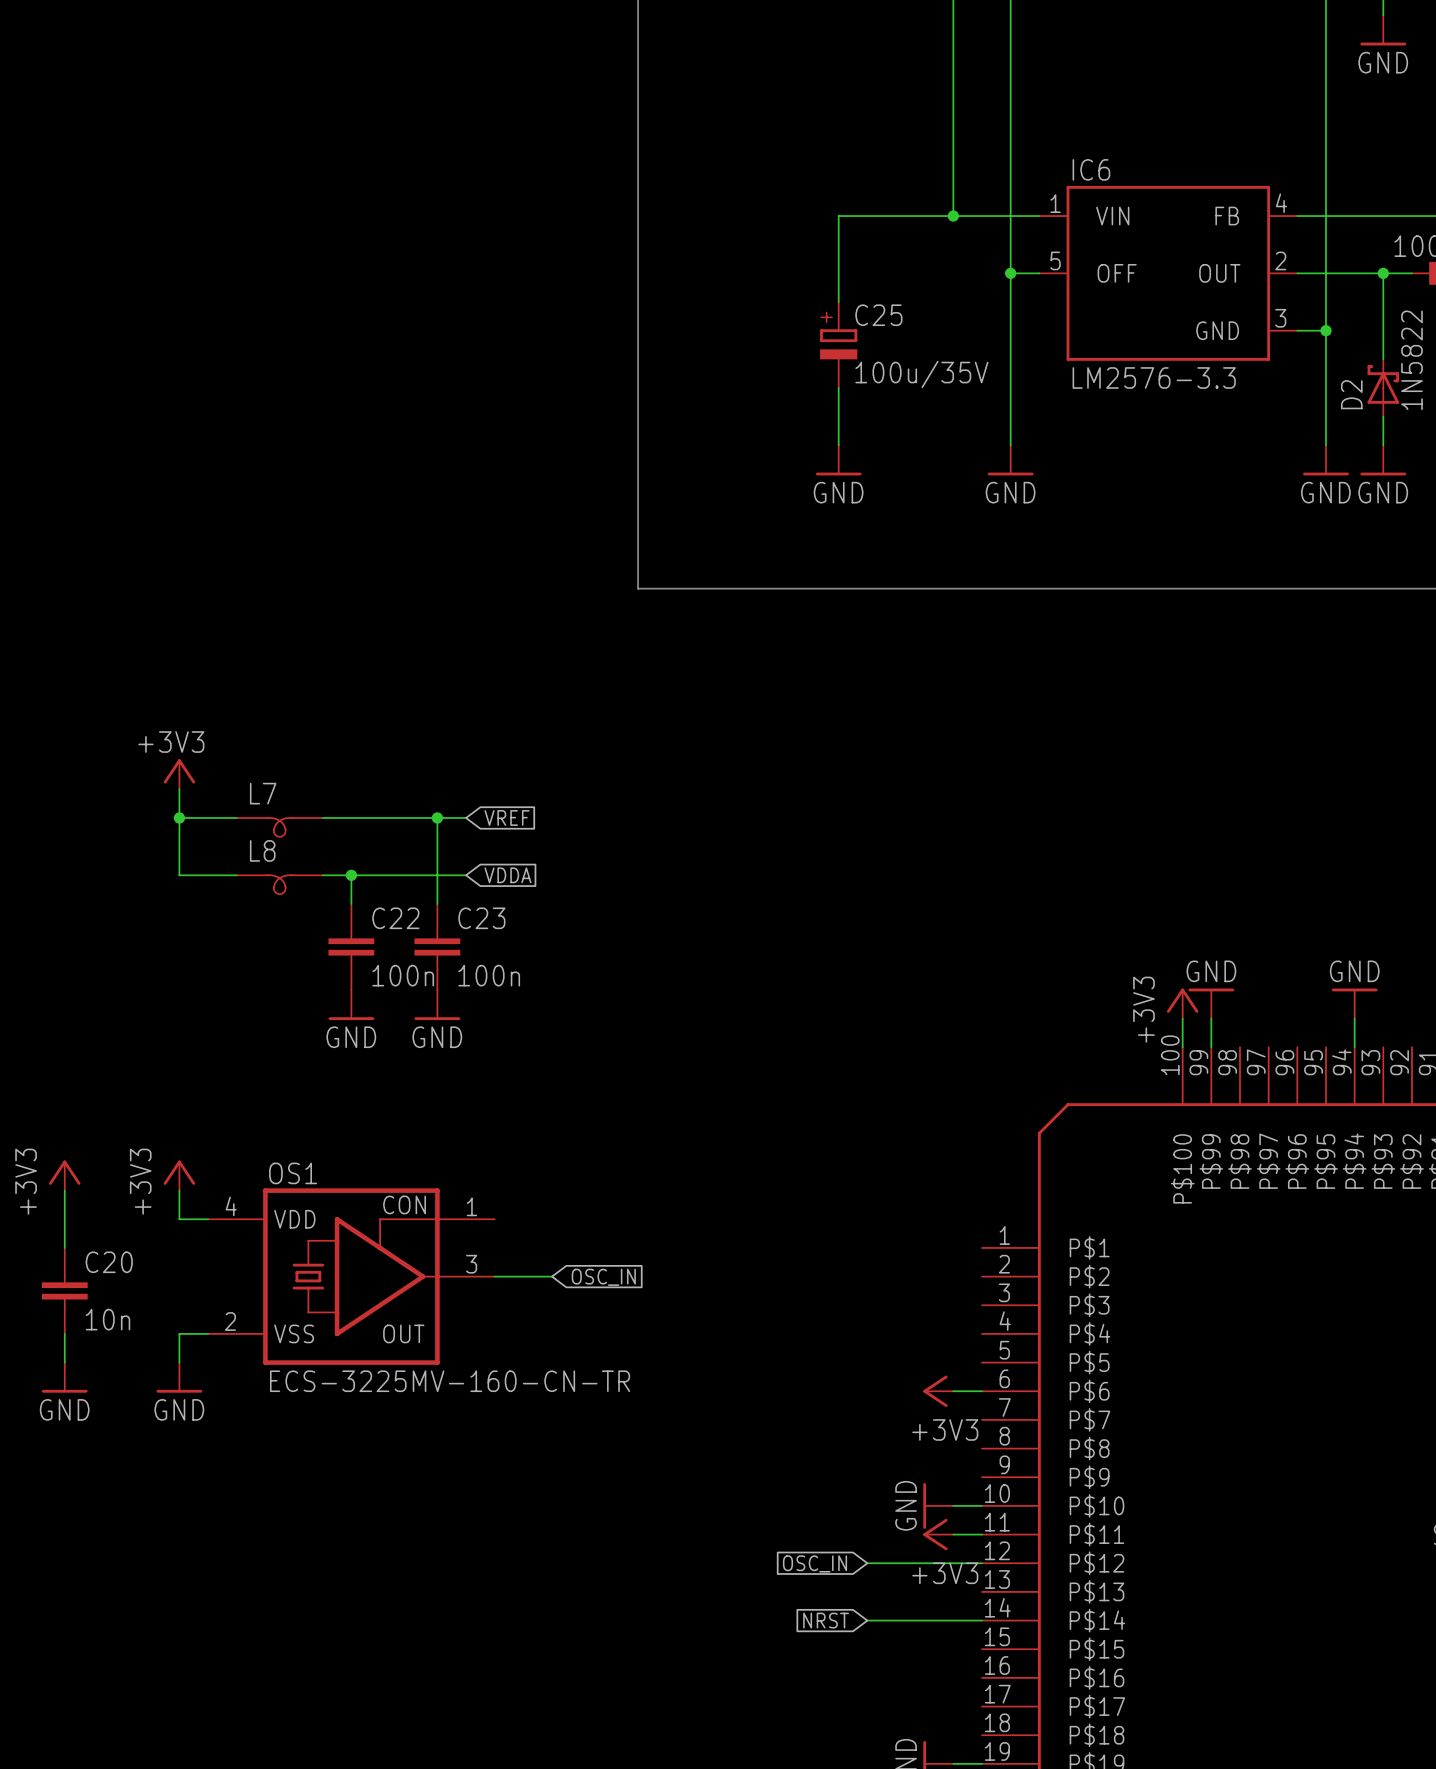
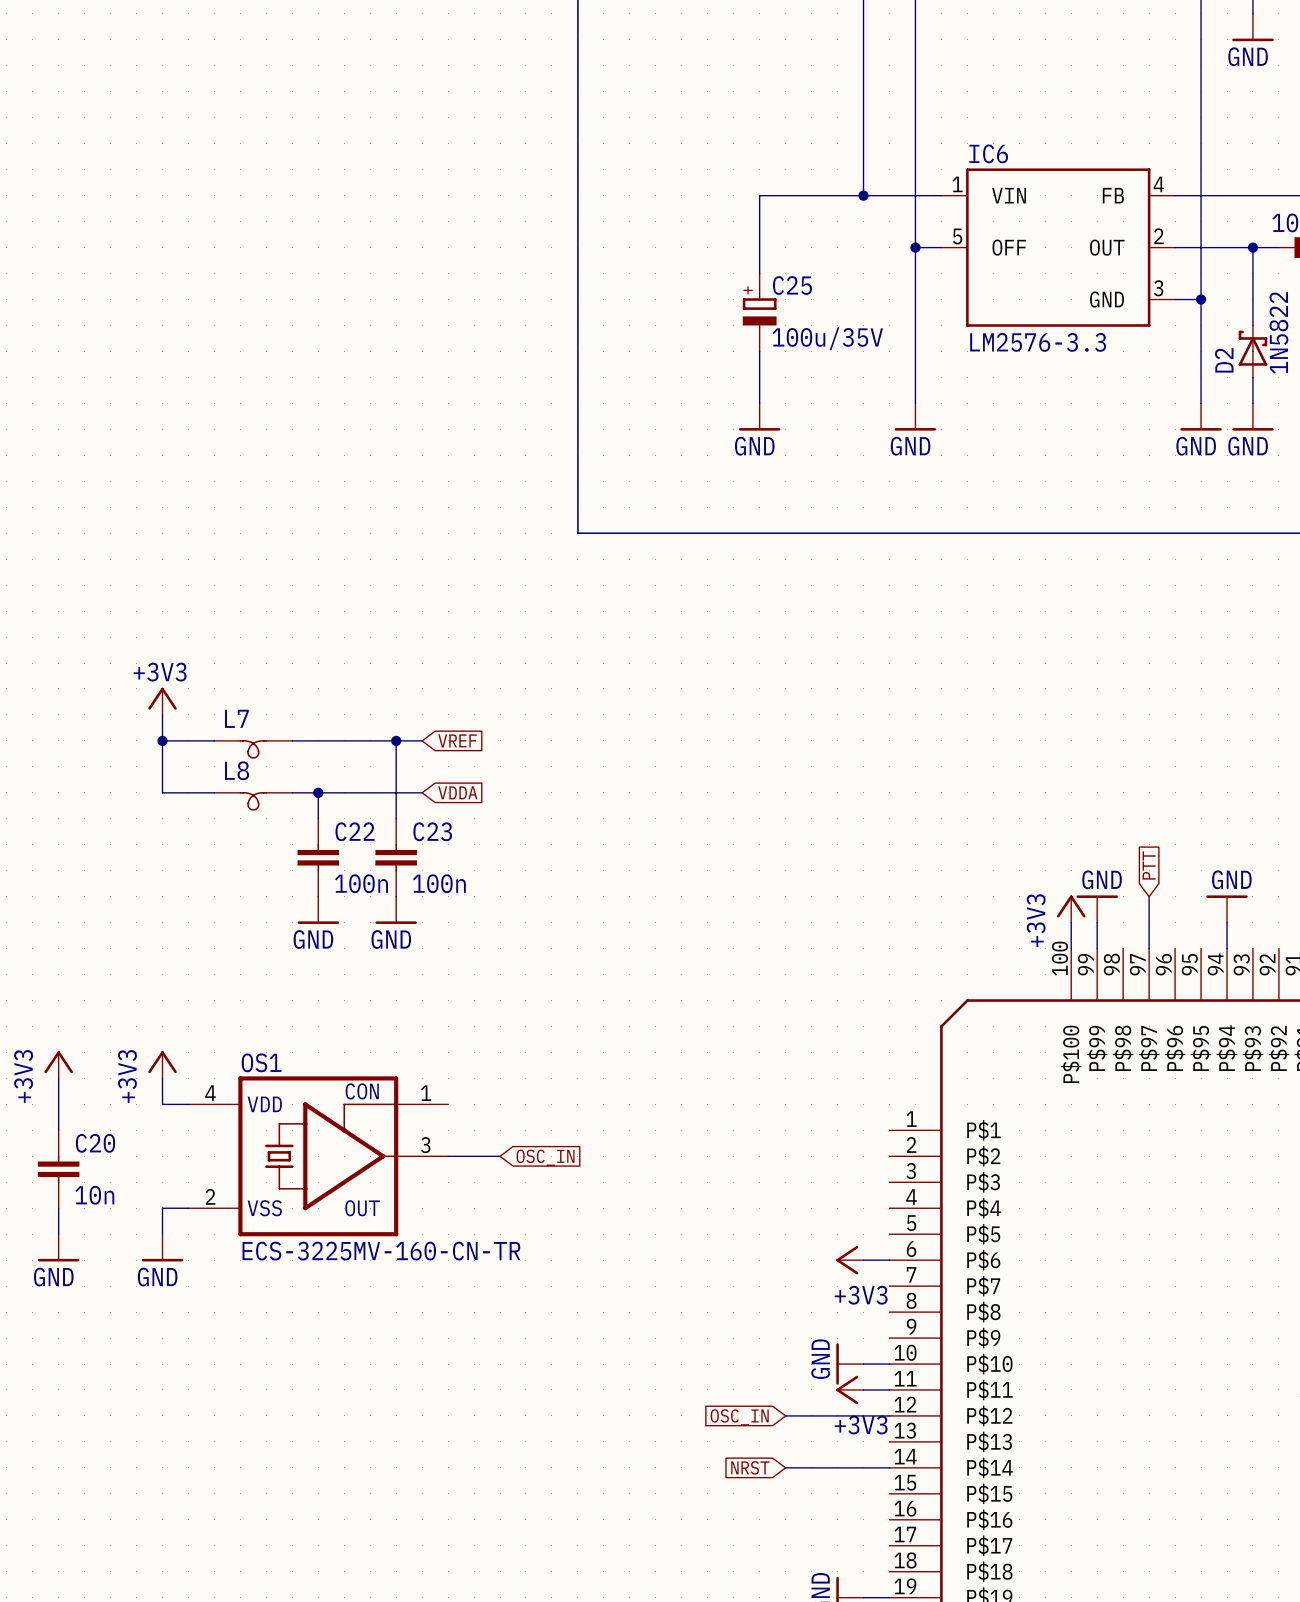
global label: none -> PTT (1149, 865)
wire: none -> (1149, 896) (1149, 948)

